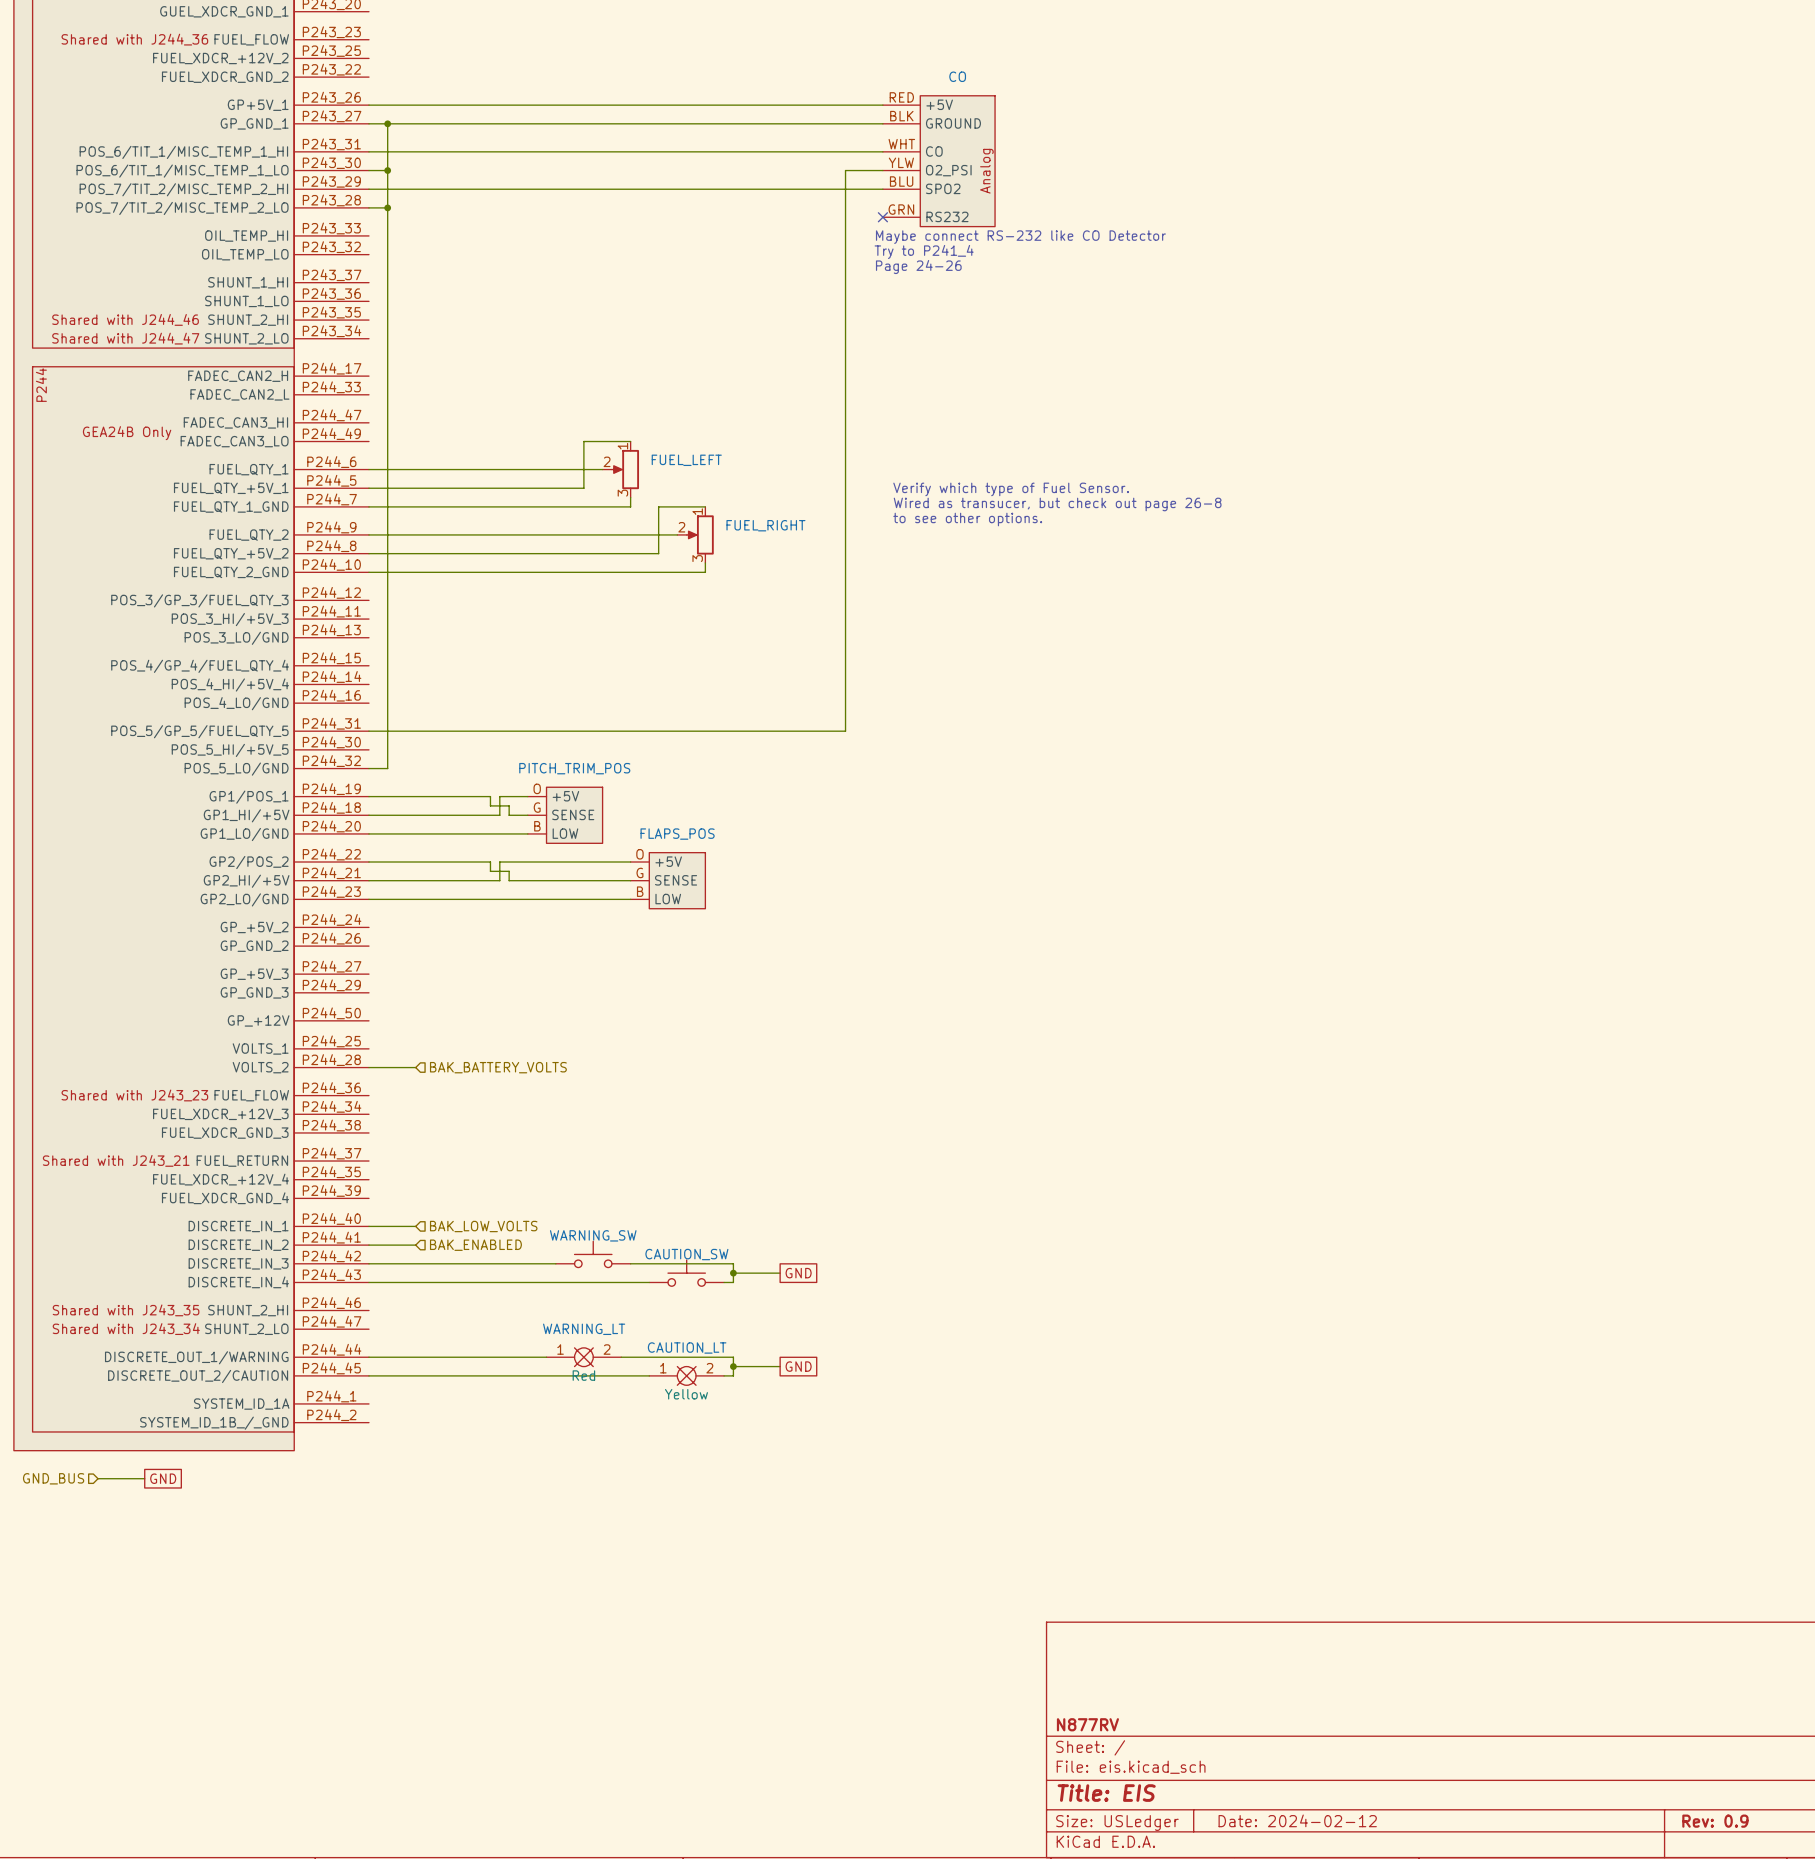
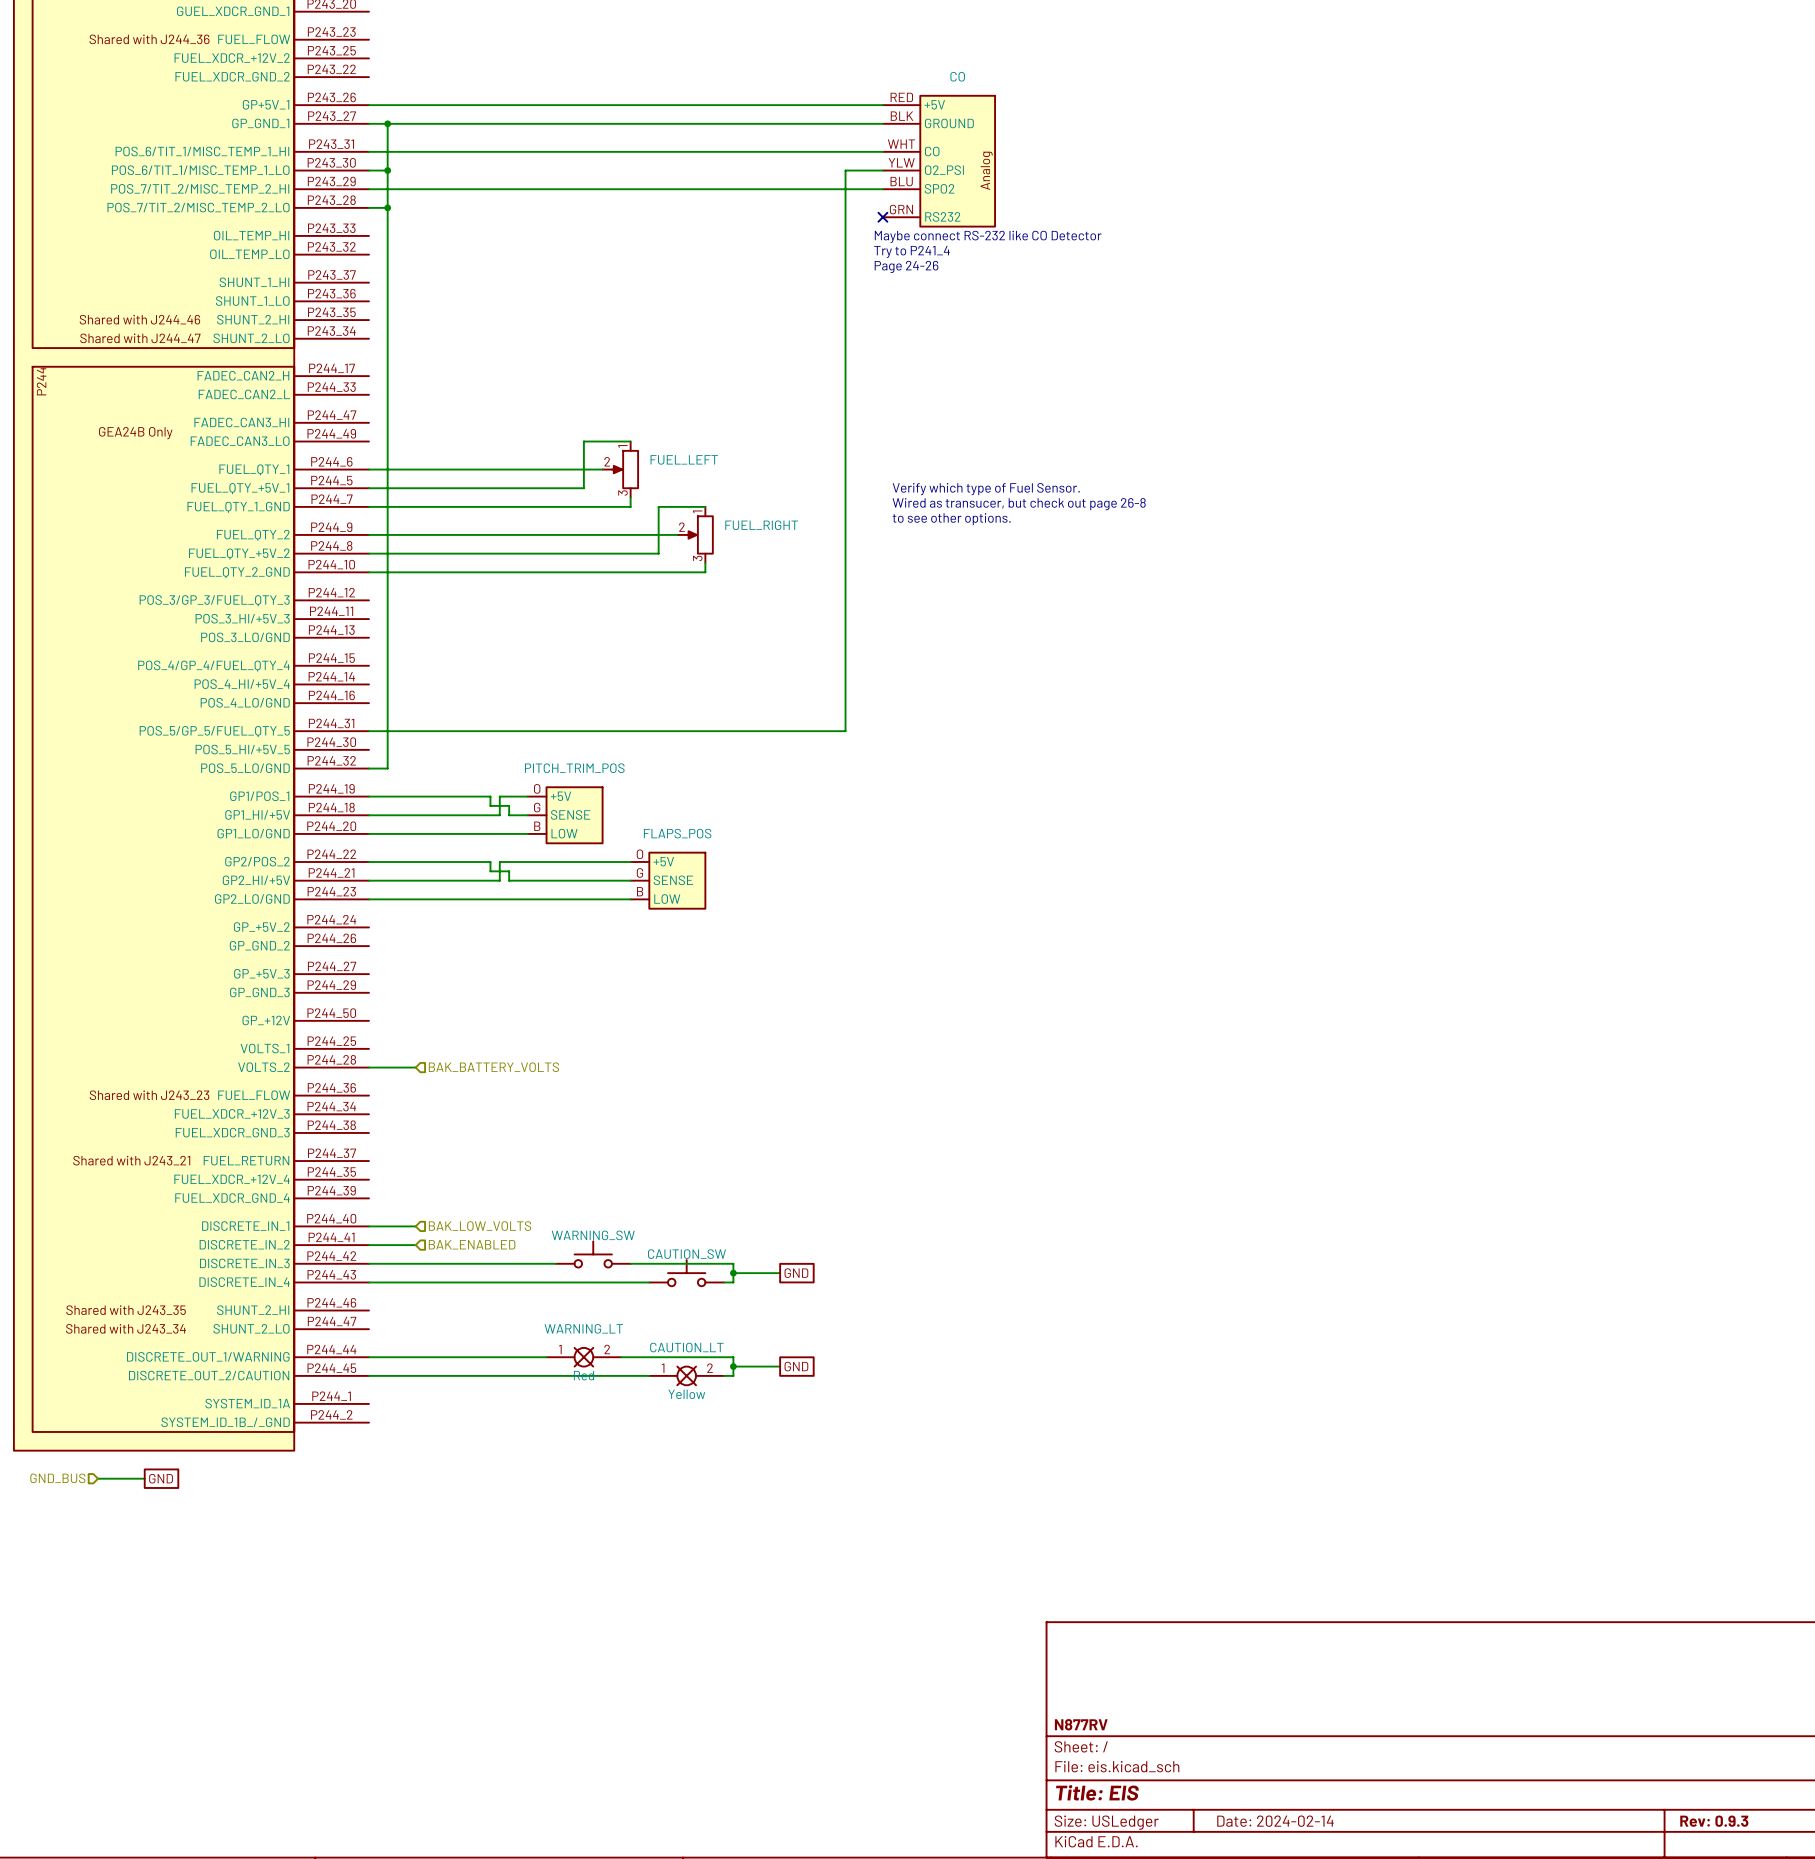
title block: Date: 2024-02-12 (1297, 1820) -> Date: 2024-02-14 (1275, 1821)
title block: Rev: 0.9 (1715, 1821) -> Rev: 0.9.3 (1714, 1821)

